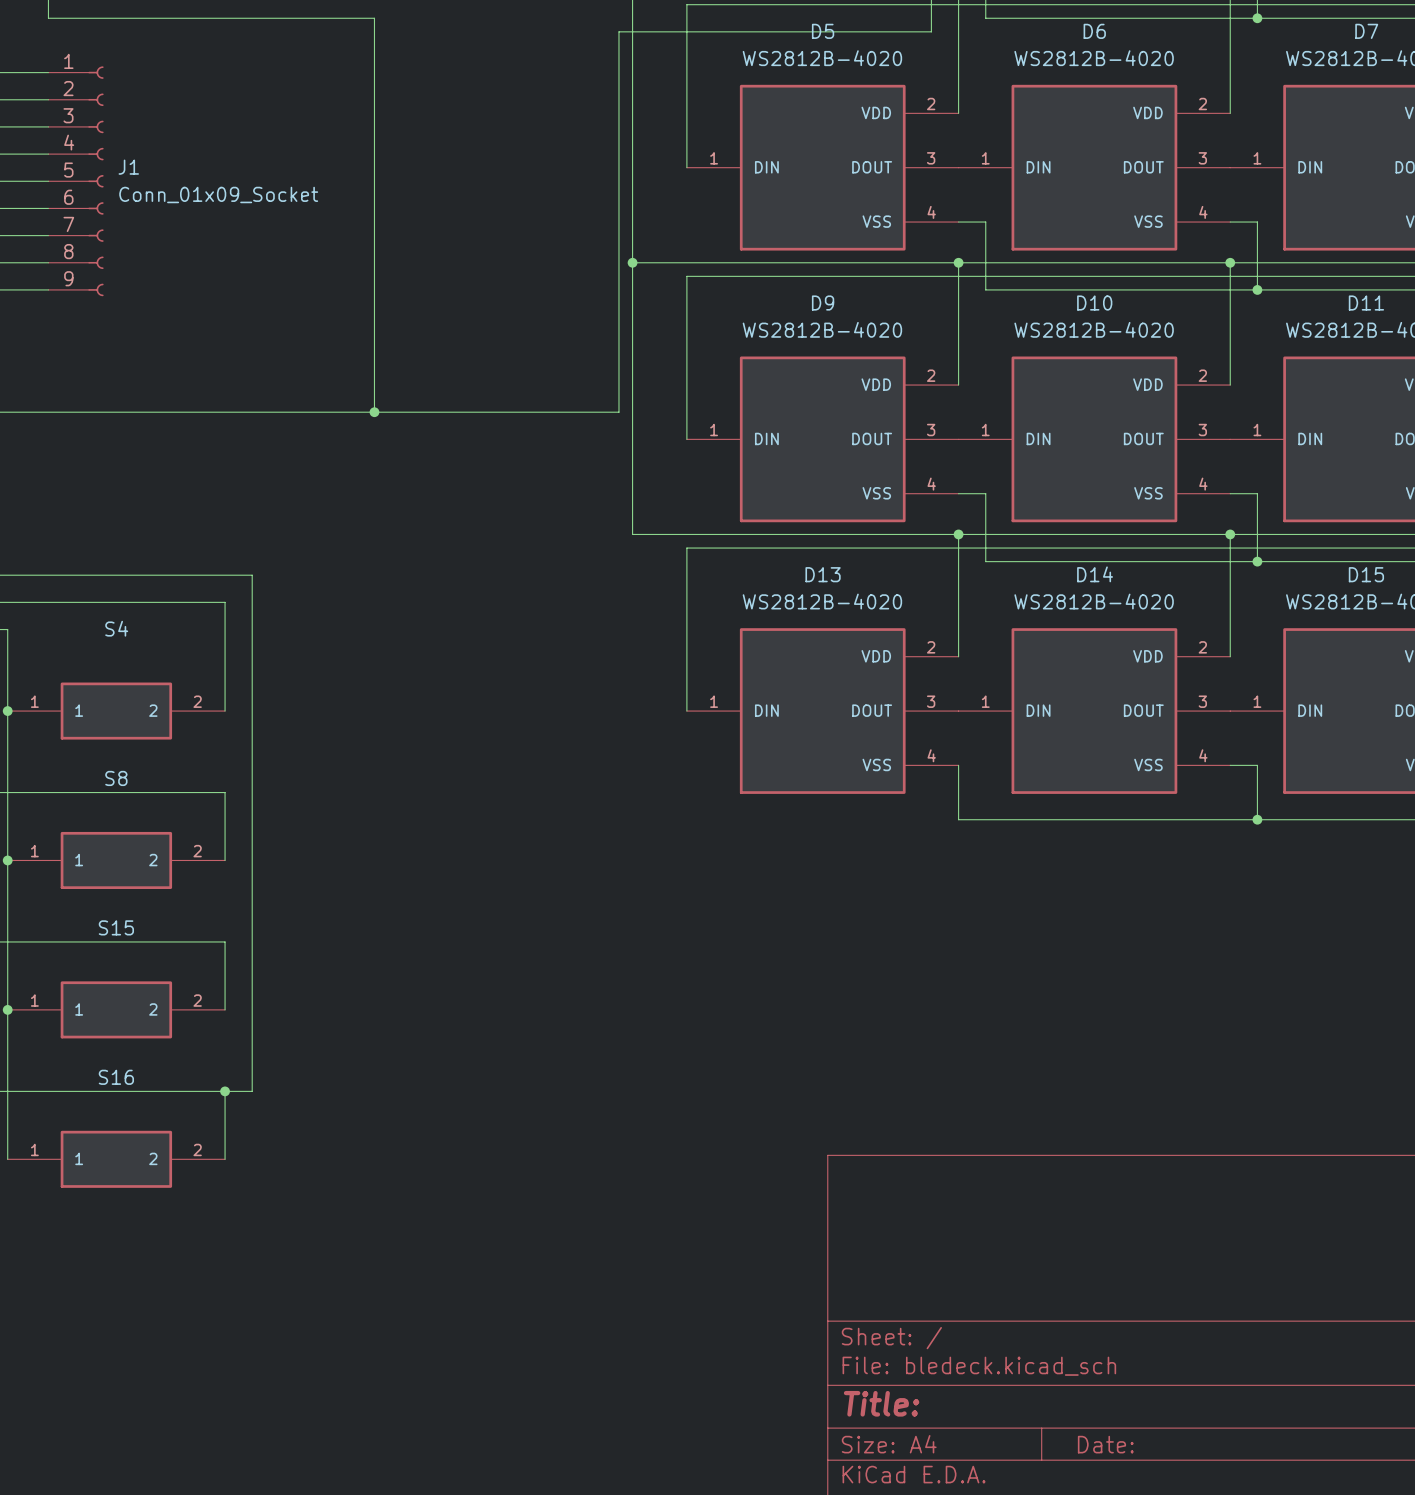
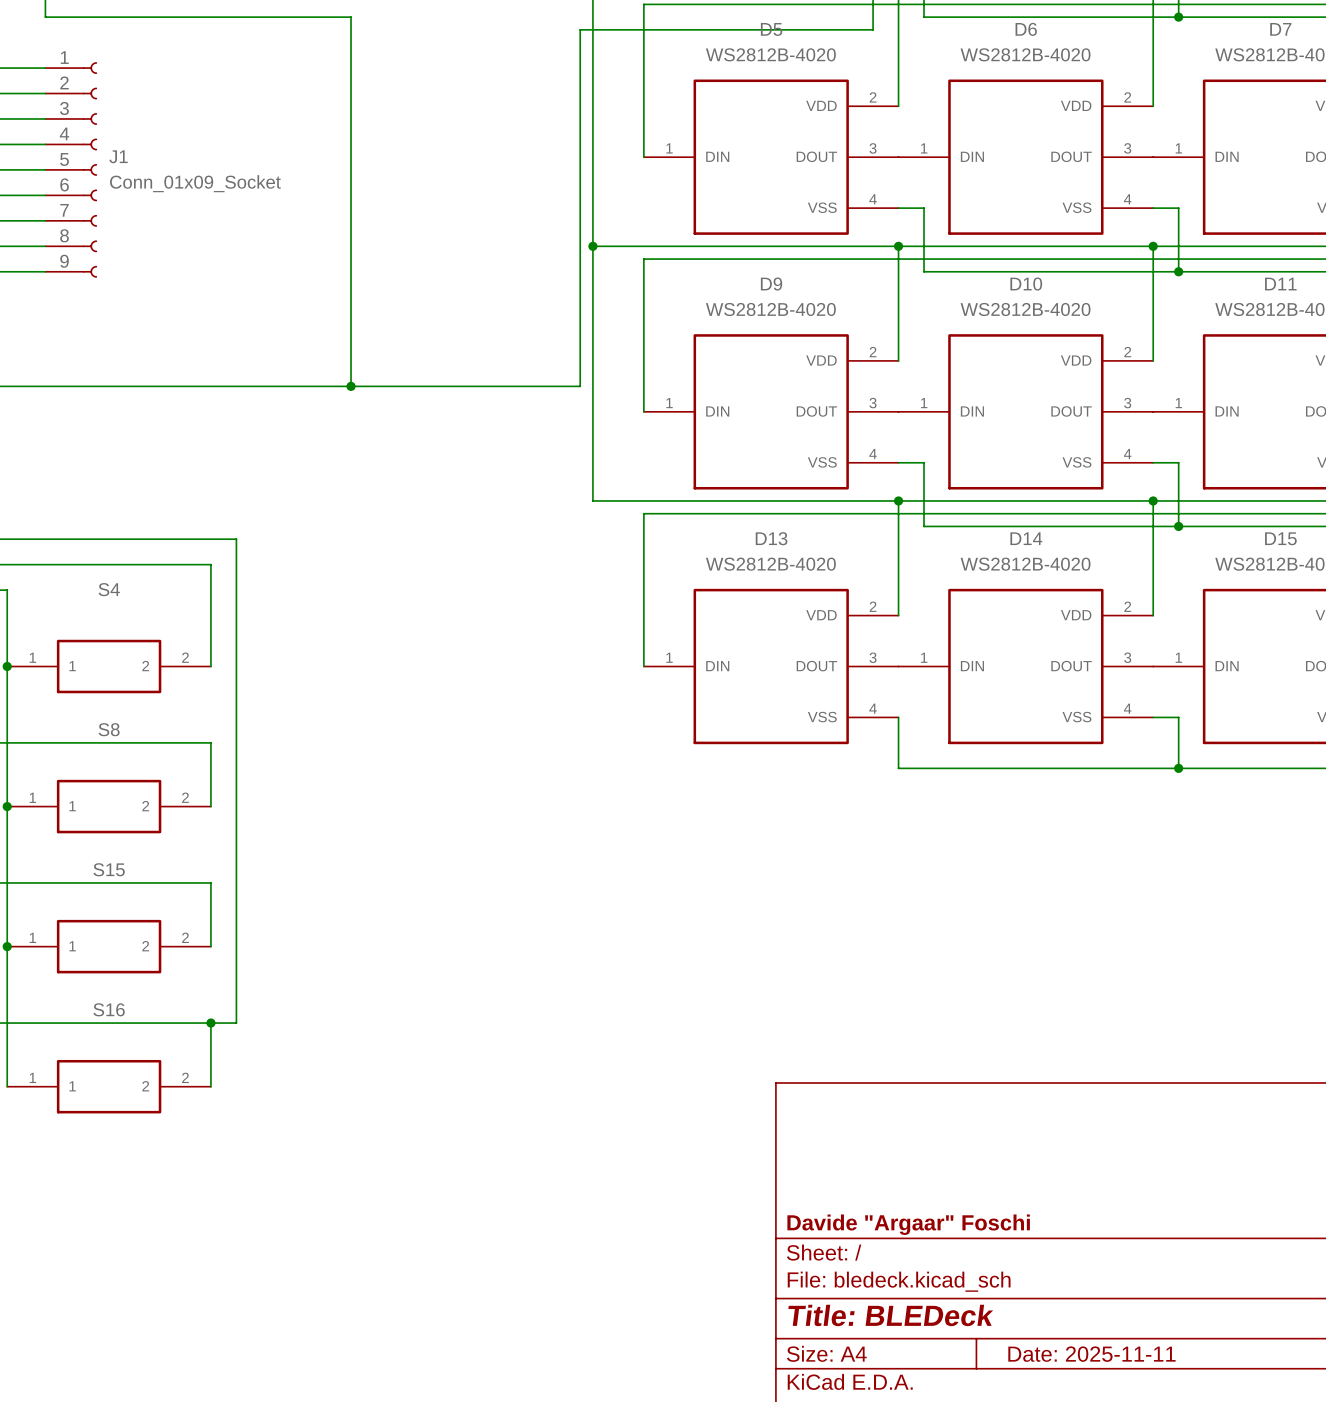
title block: none -> Davide "Argaar" Foschi (908, 1224)
title block: Title: (881, 1403) -> Title: BLEDeck (890, 1315)
title block: Date: (1105, 1444) -> Date: 2025-11-11 (1091, 1354)

